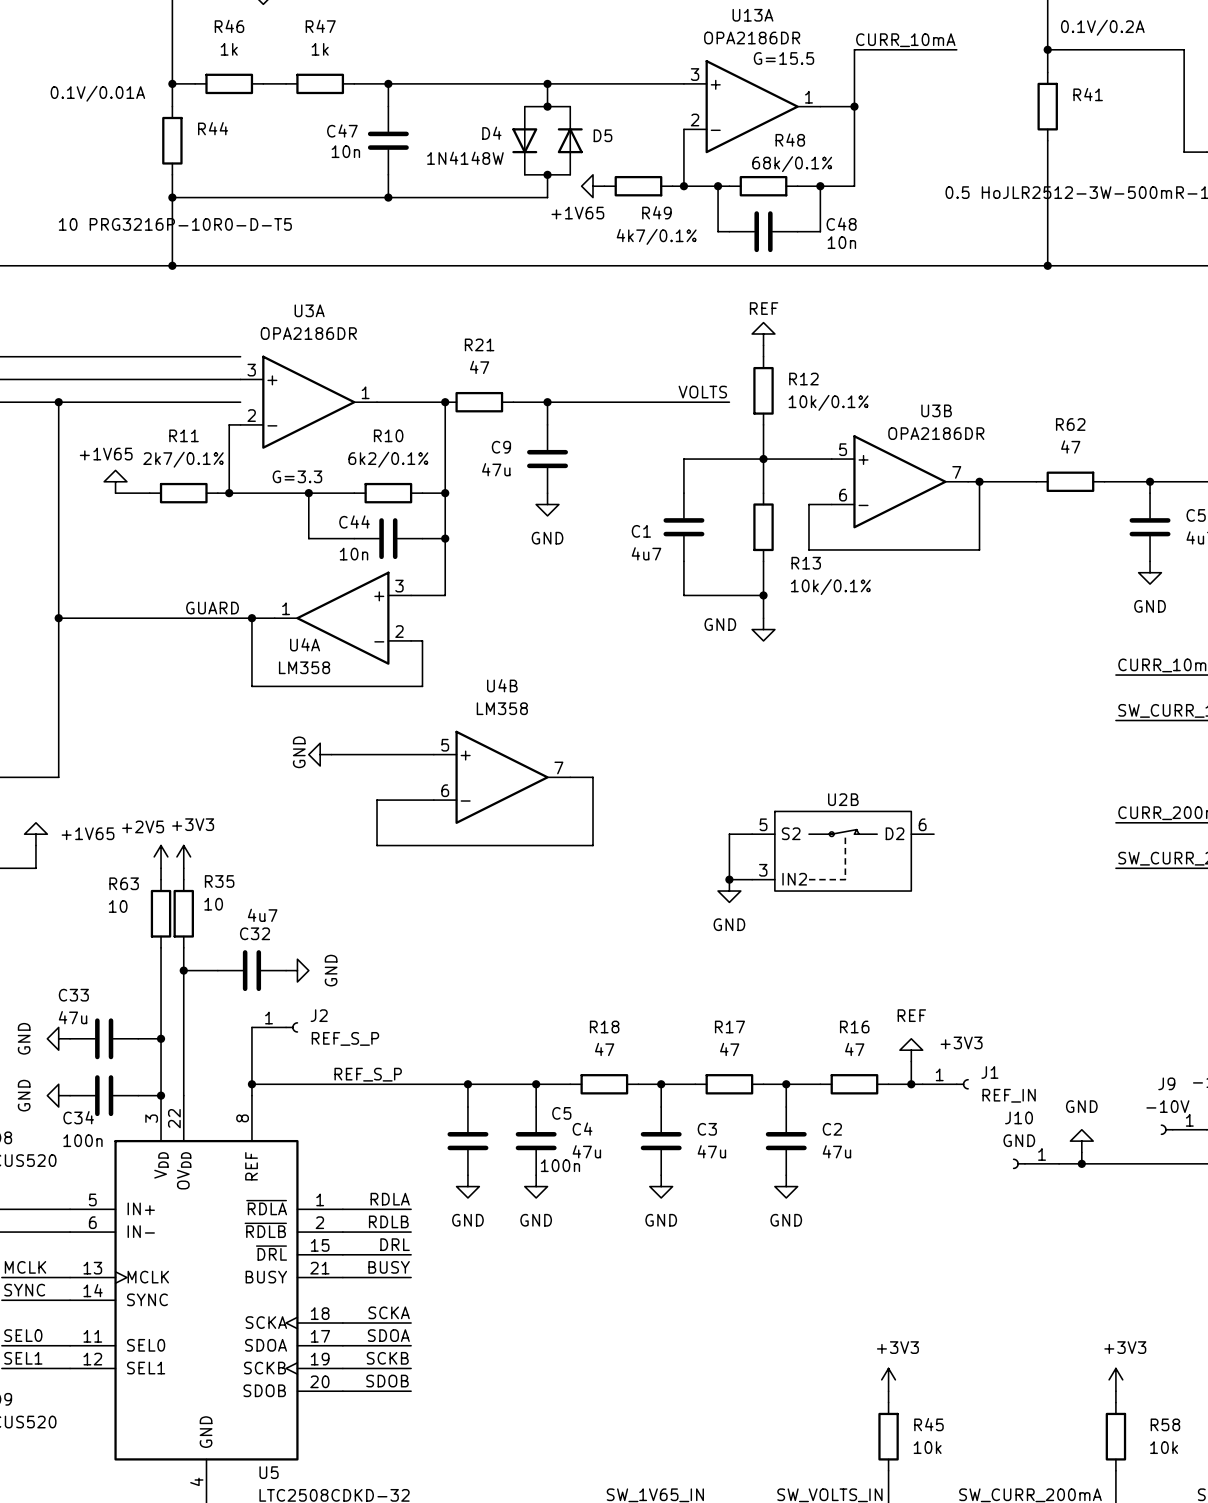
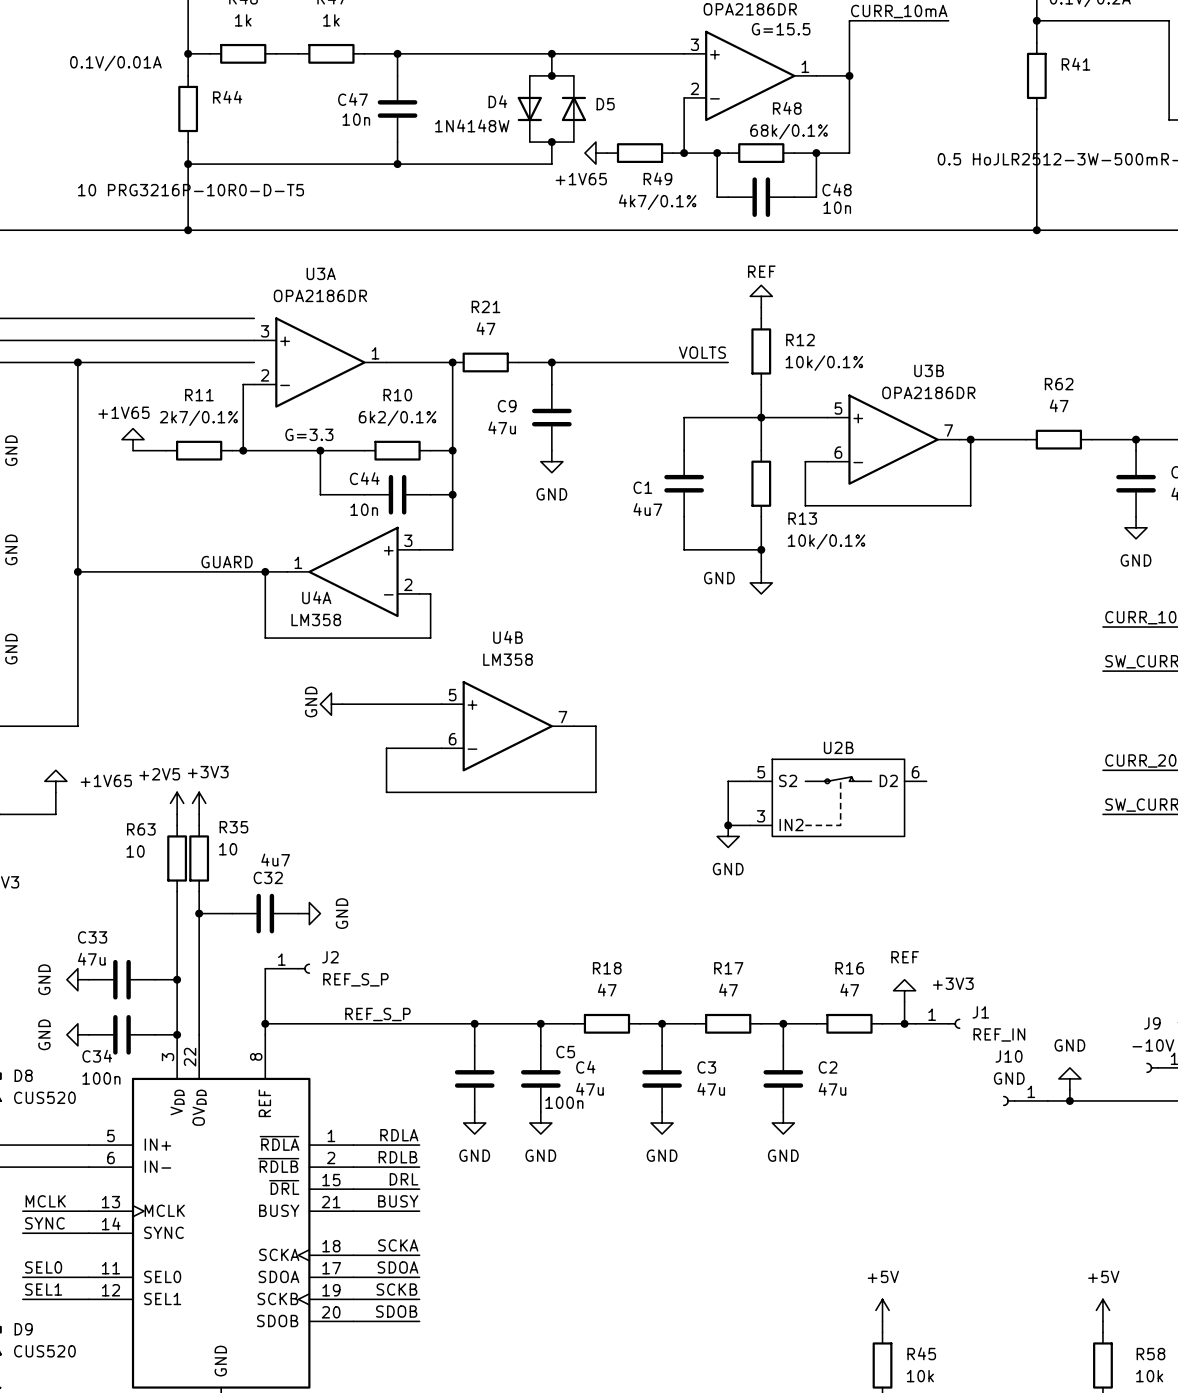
power symbol: +3V3 (888, 1379) -> +5V (882, 1310)
power symbol: +3V3 (1115, 1379) -> +5V (1102, 1310)

